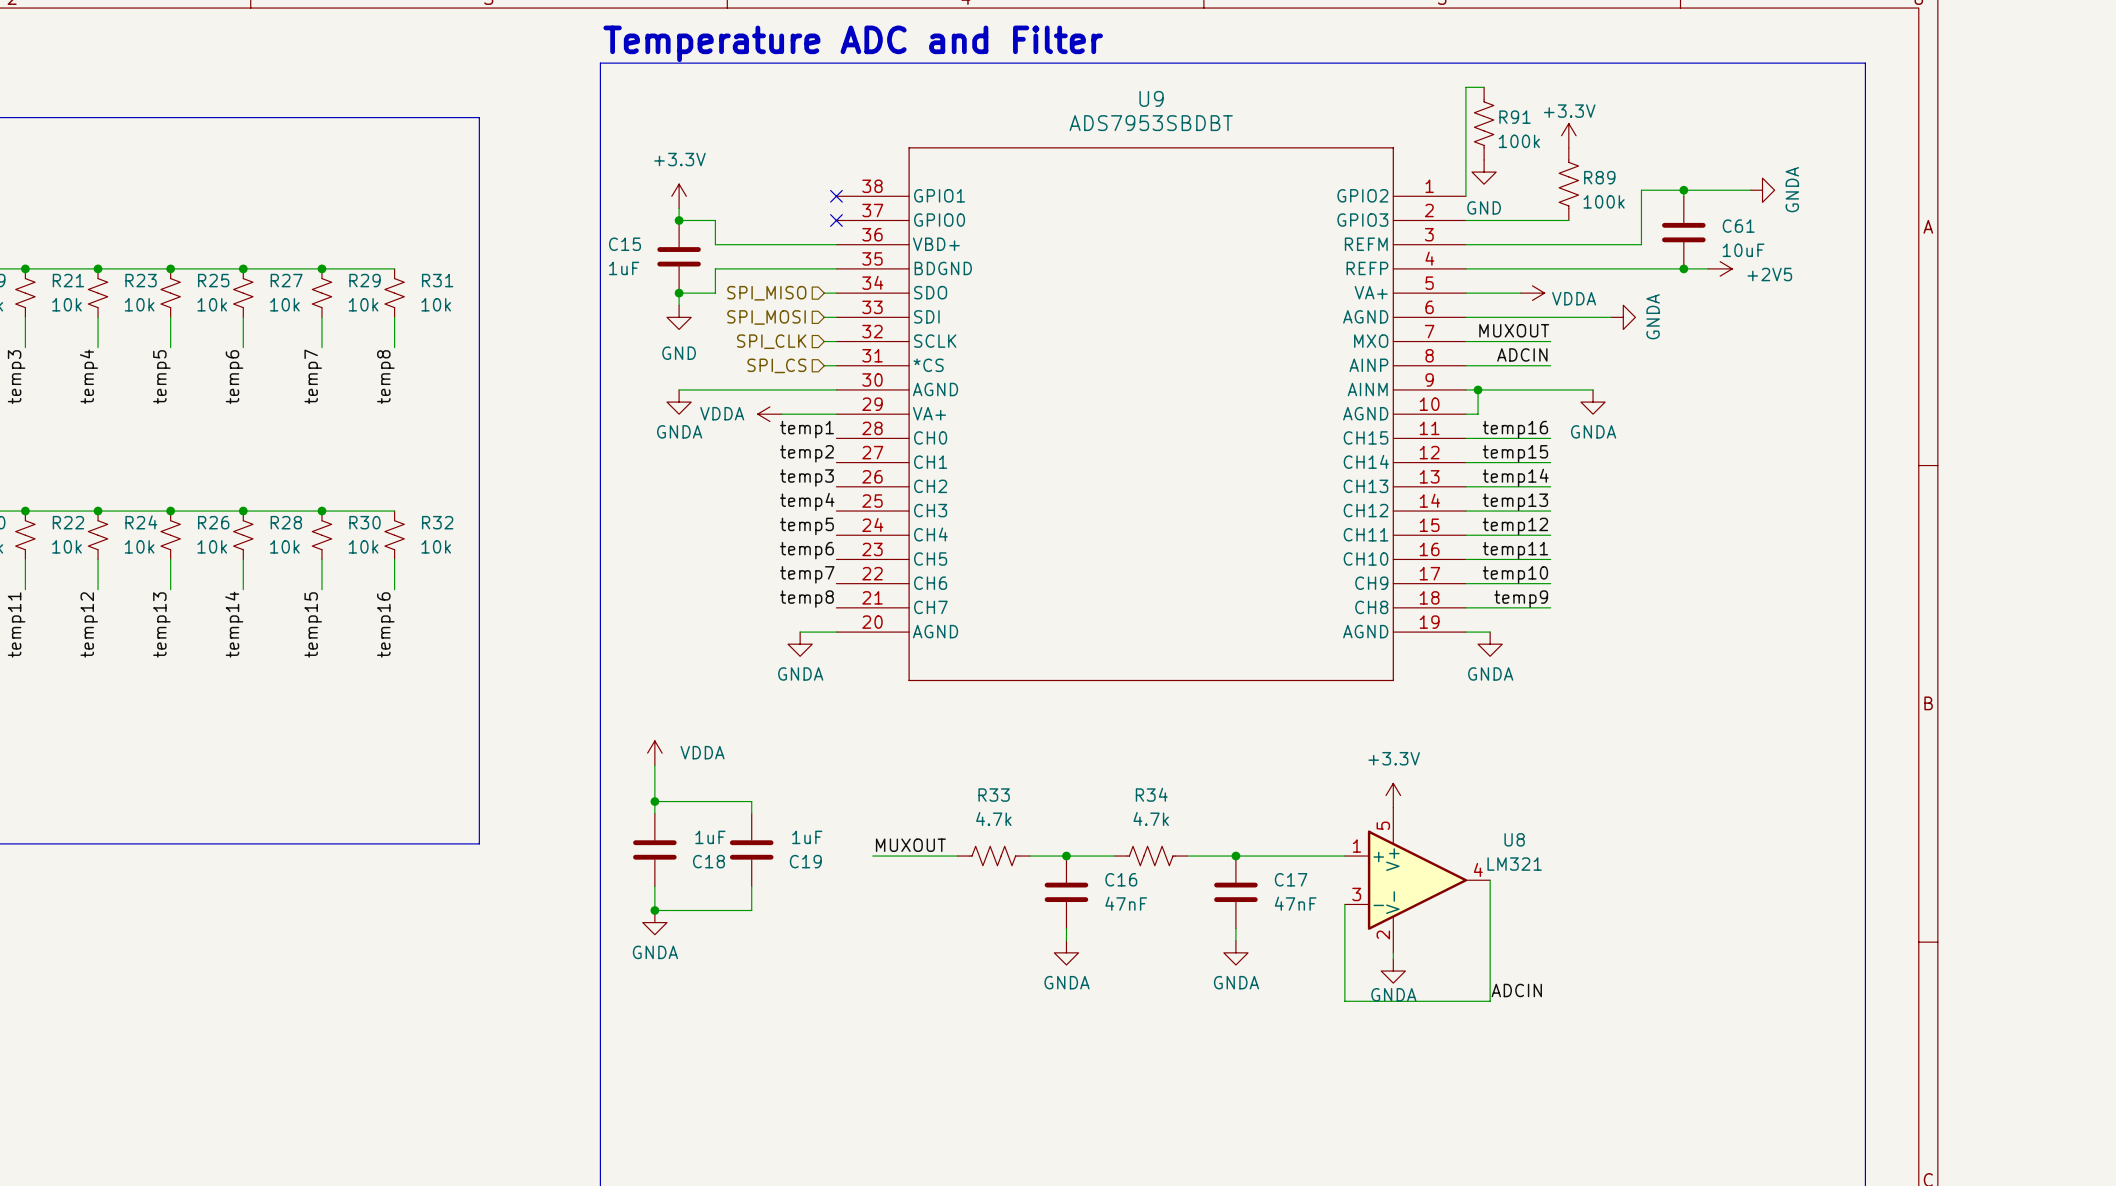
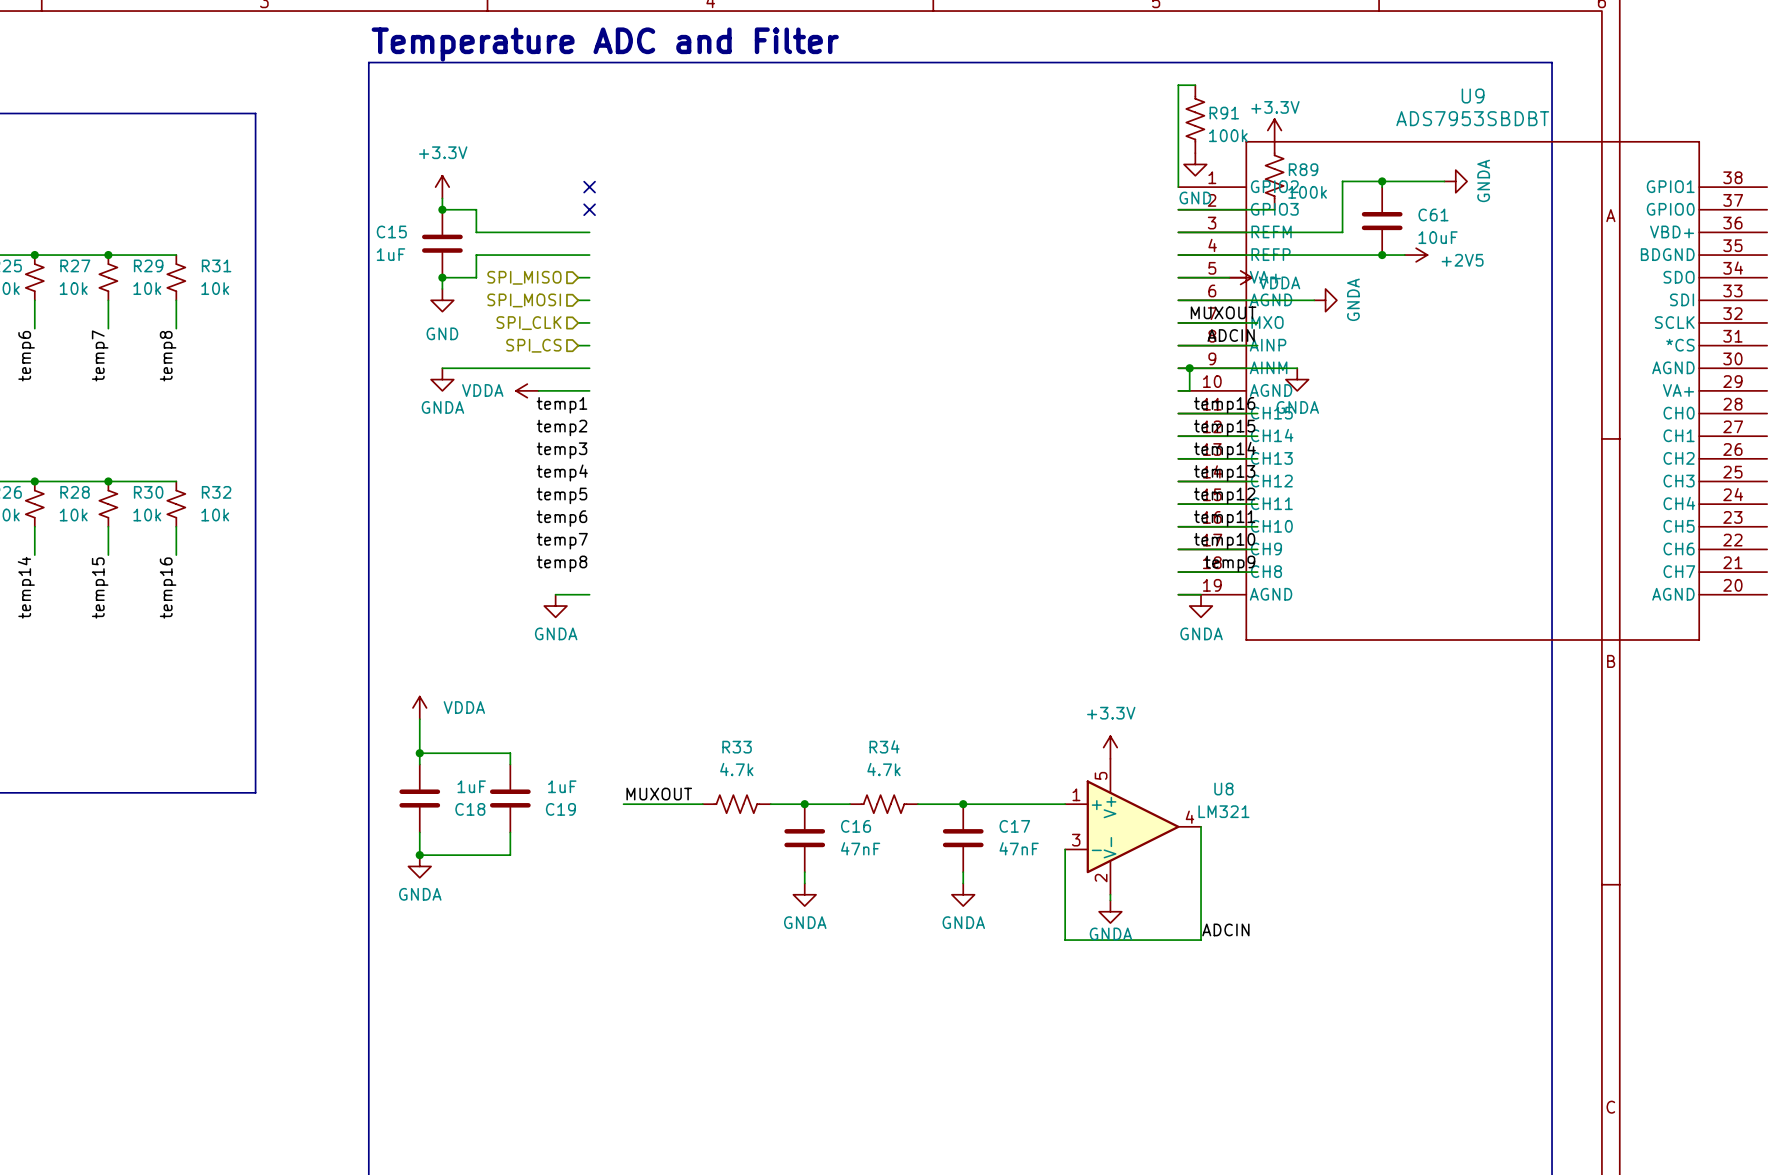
U9 flip: as is (1151, 414) -> left-right (1472, 390)
U9 position: (1151, 414) -> (1472, 390)

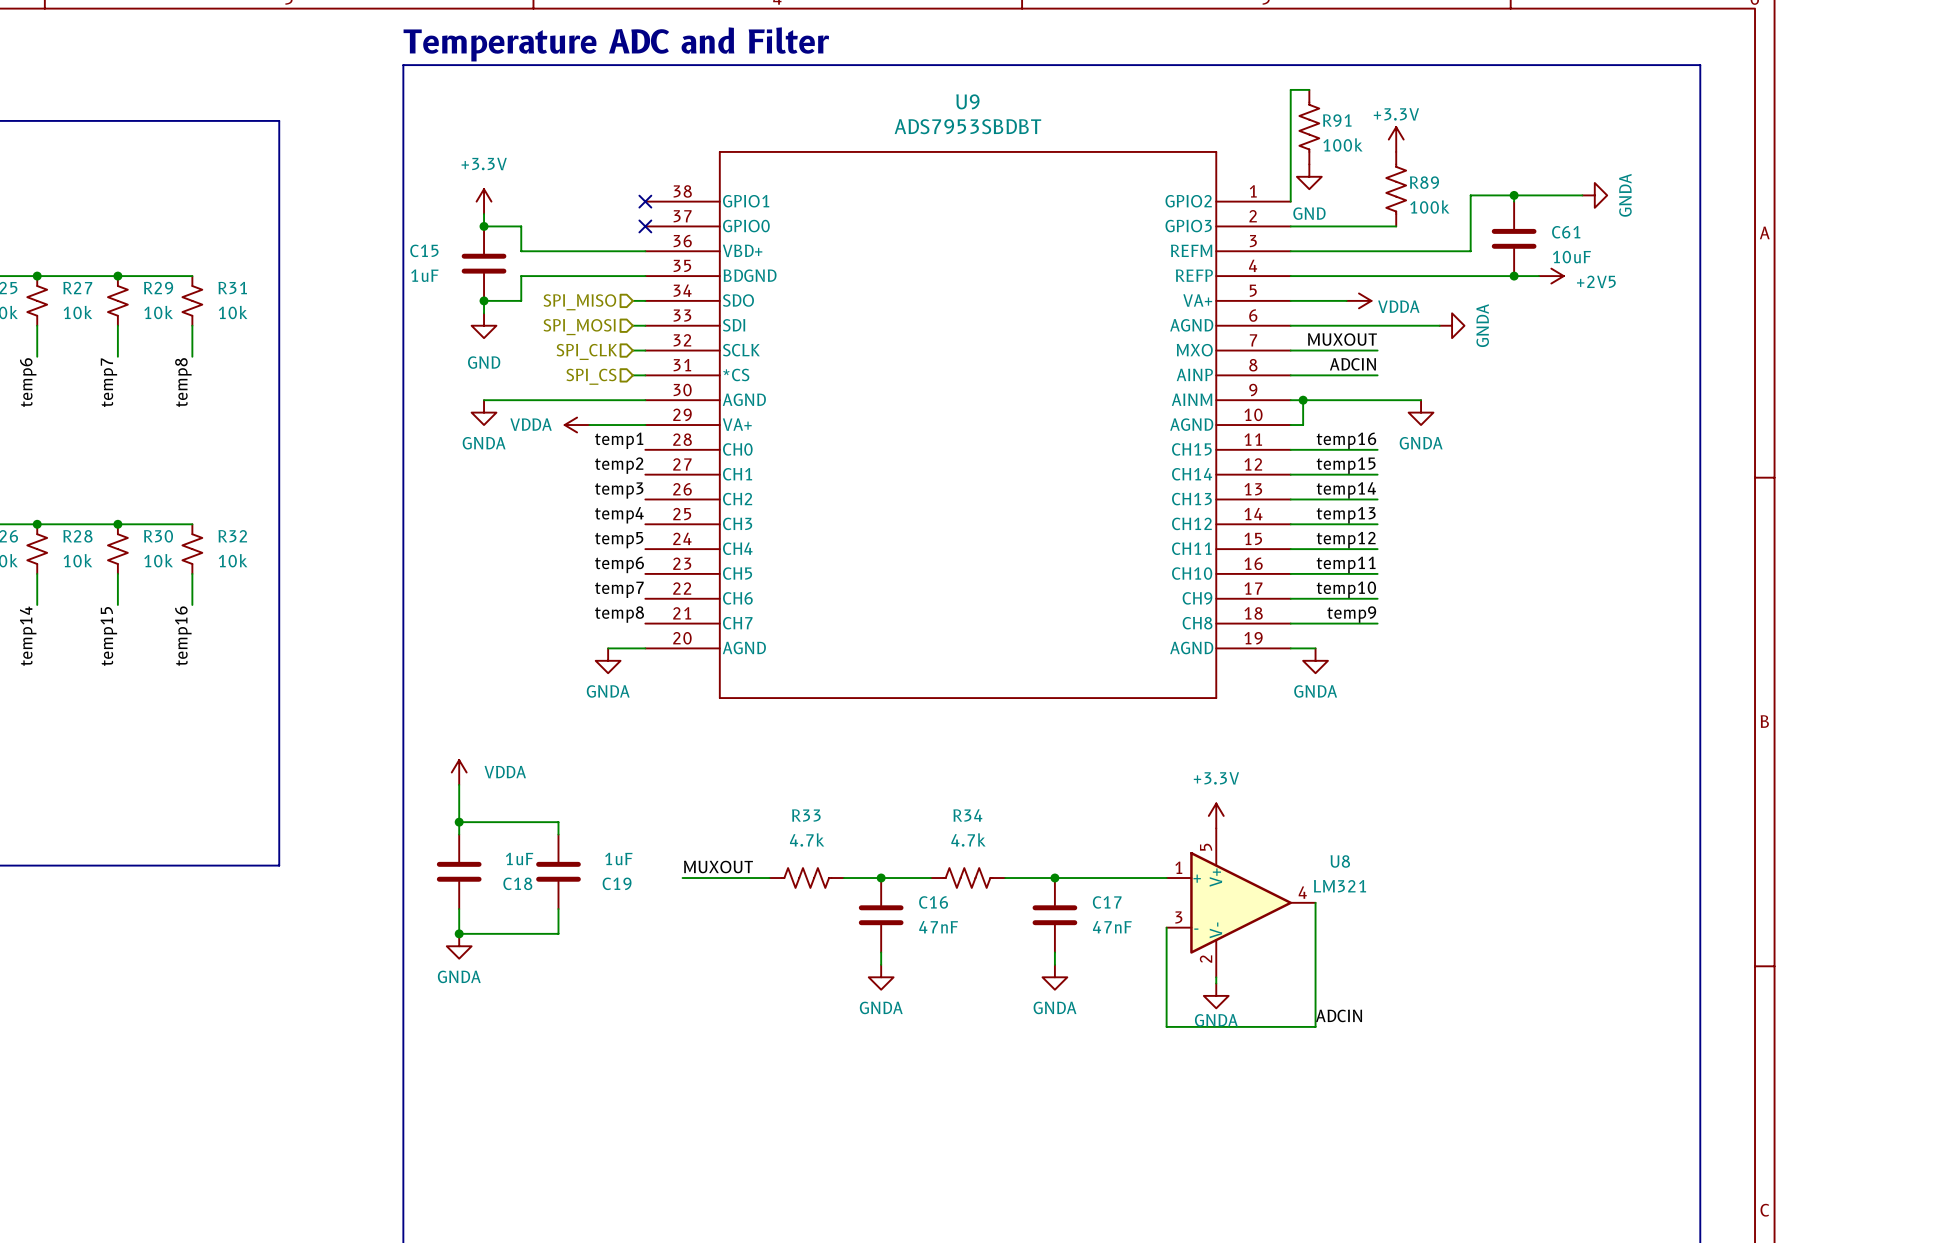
U9 flip: as is (1472, 390) -> left-right (968, 425)
U9 position: (1472, 390) -> (968, 425)

